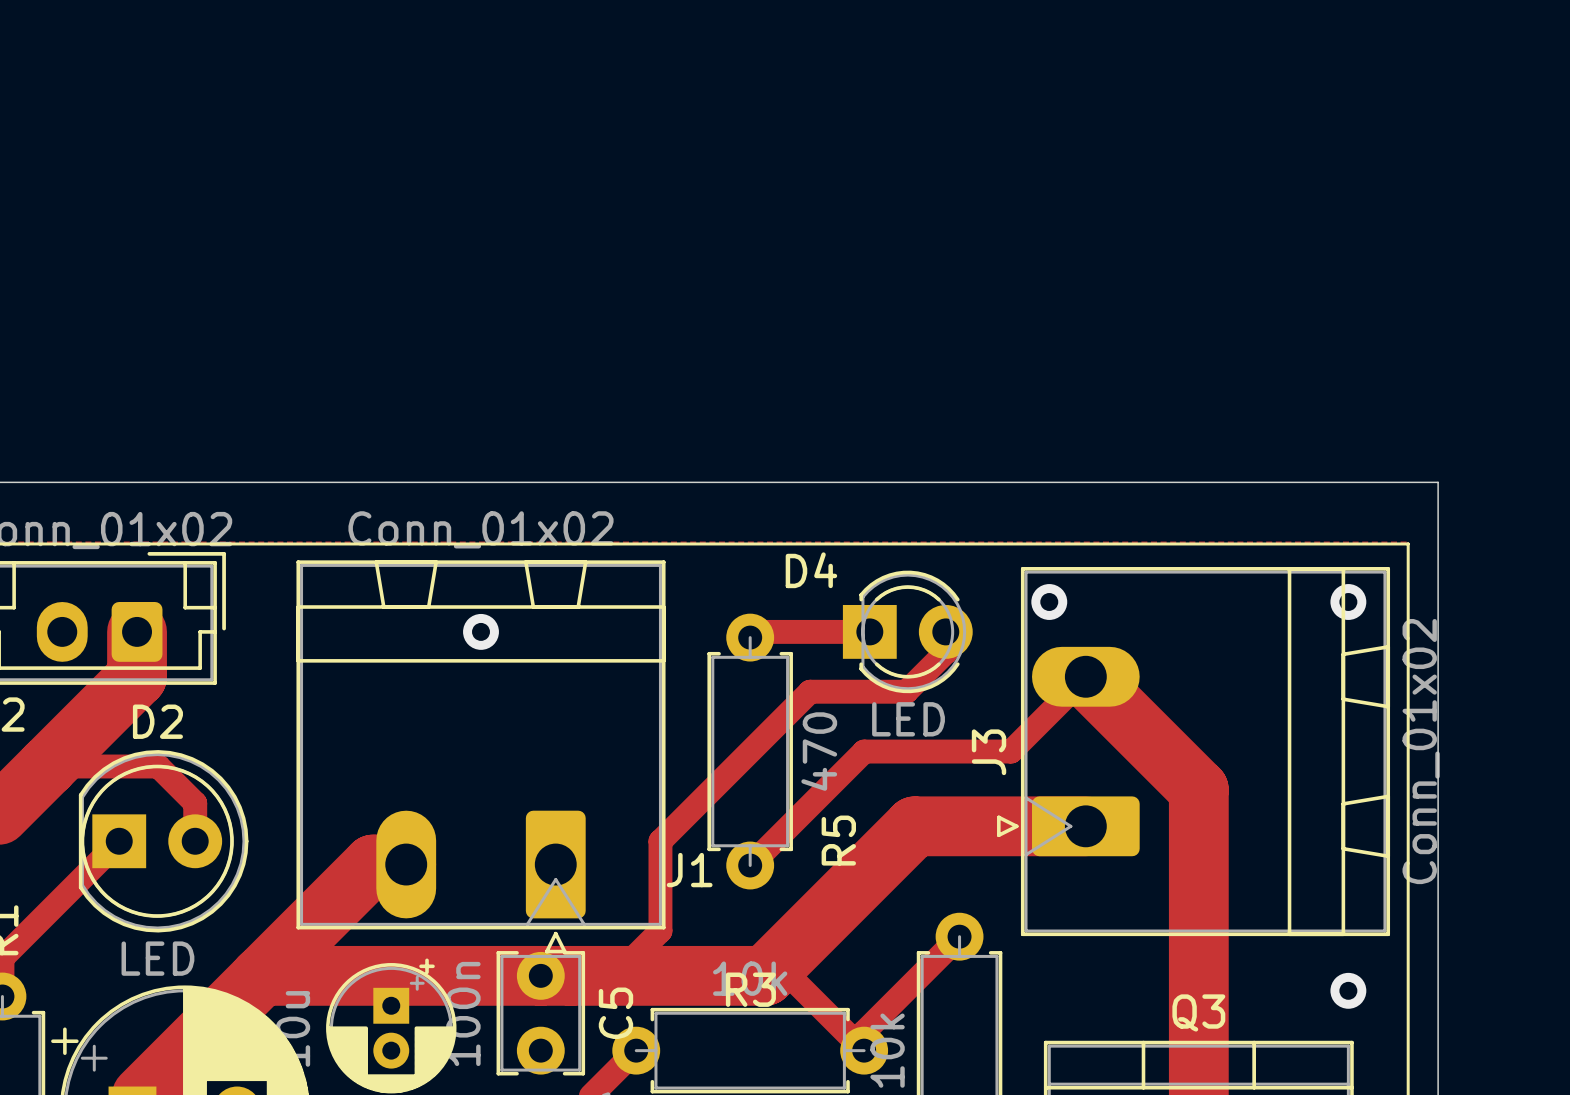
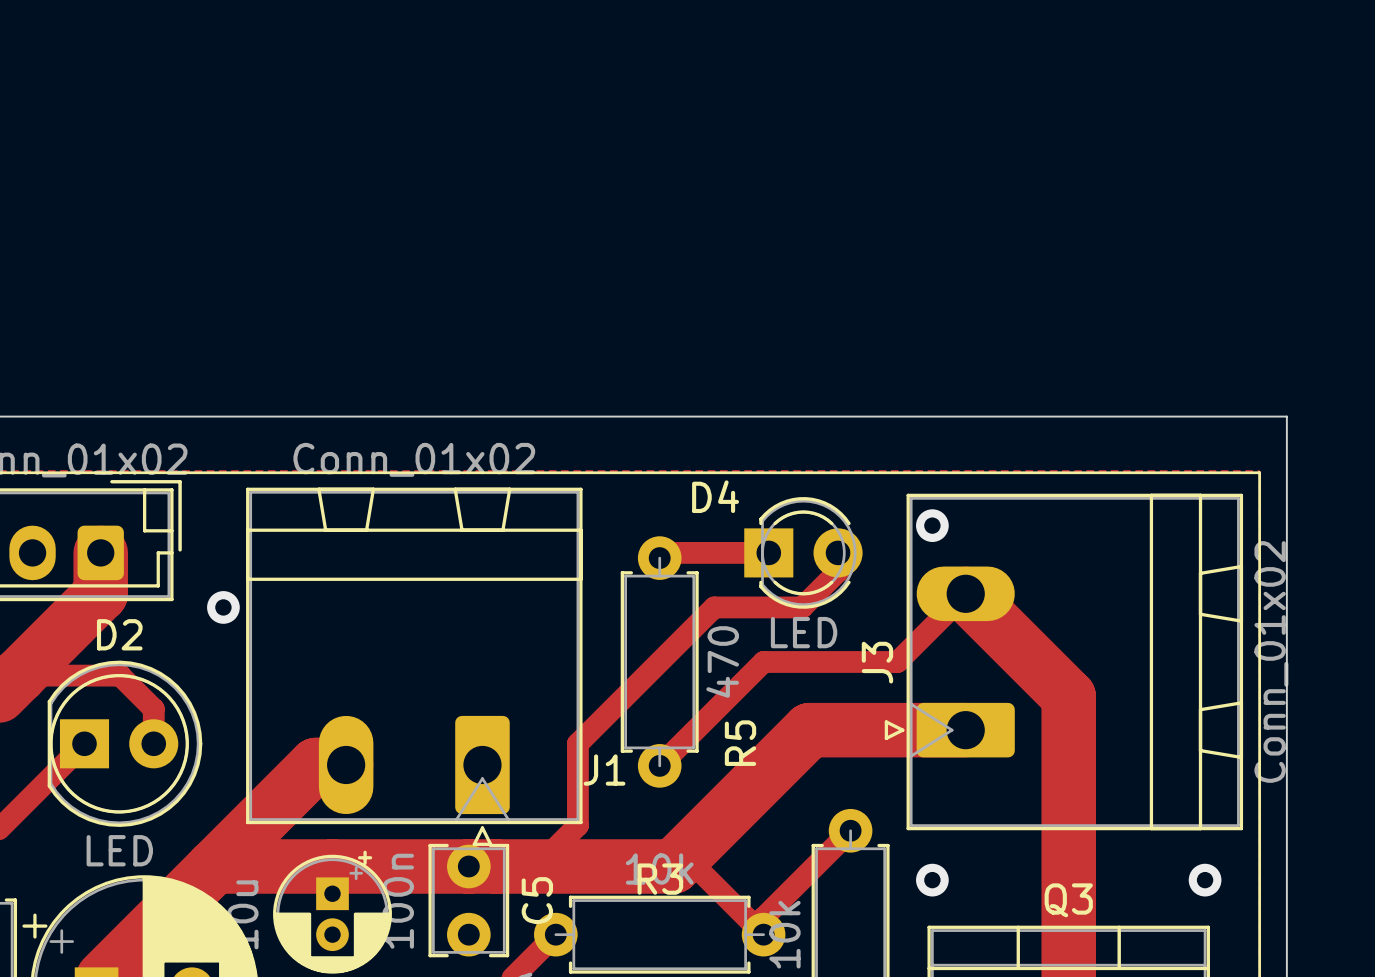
via: (1348, 602) -> none
via: (481, 631) -> none
via: none -> (223, 607)
via: none -> (932, 880)

